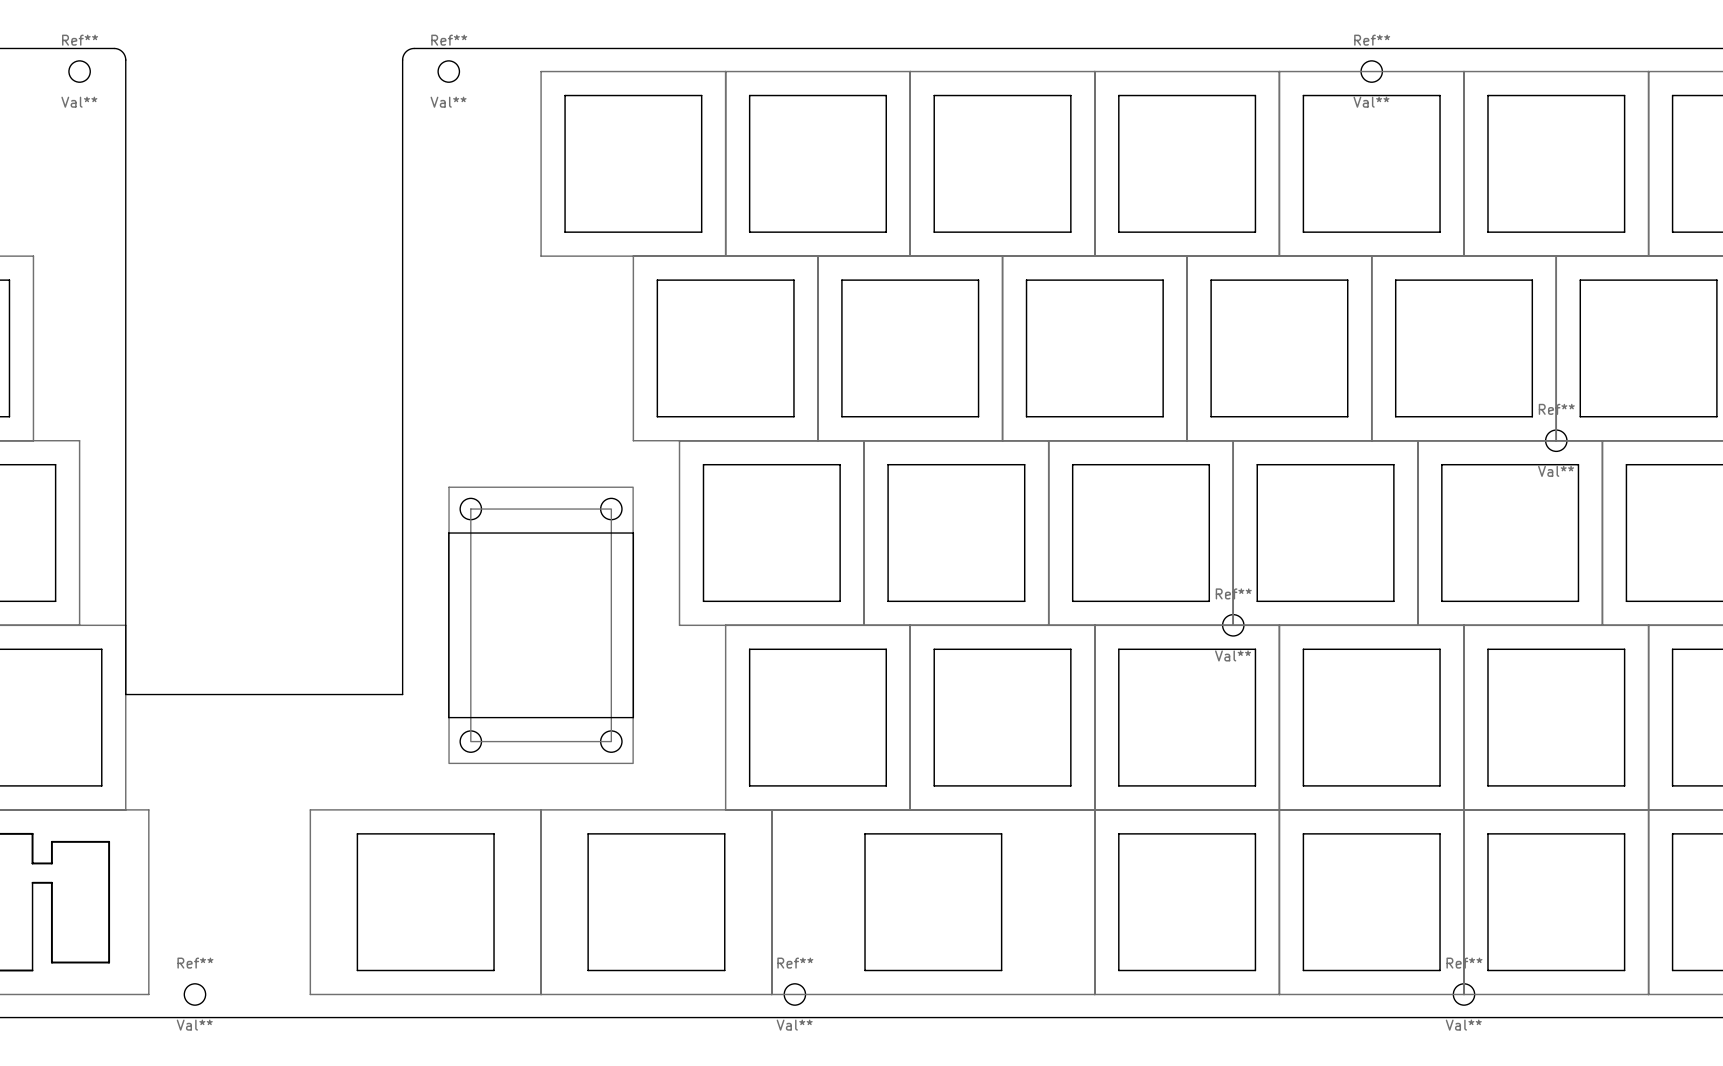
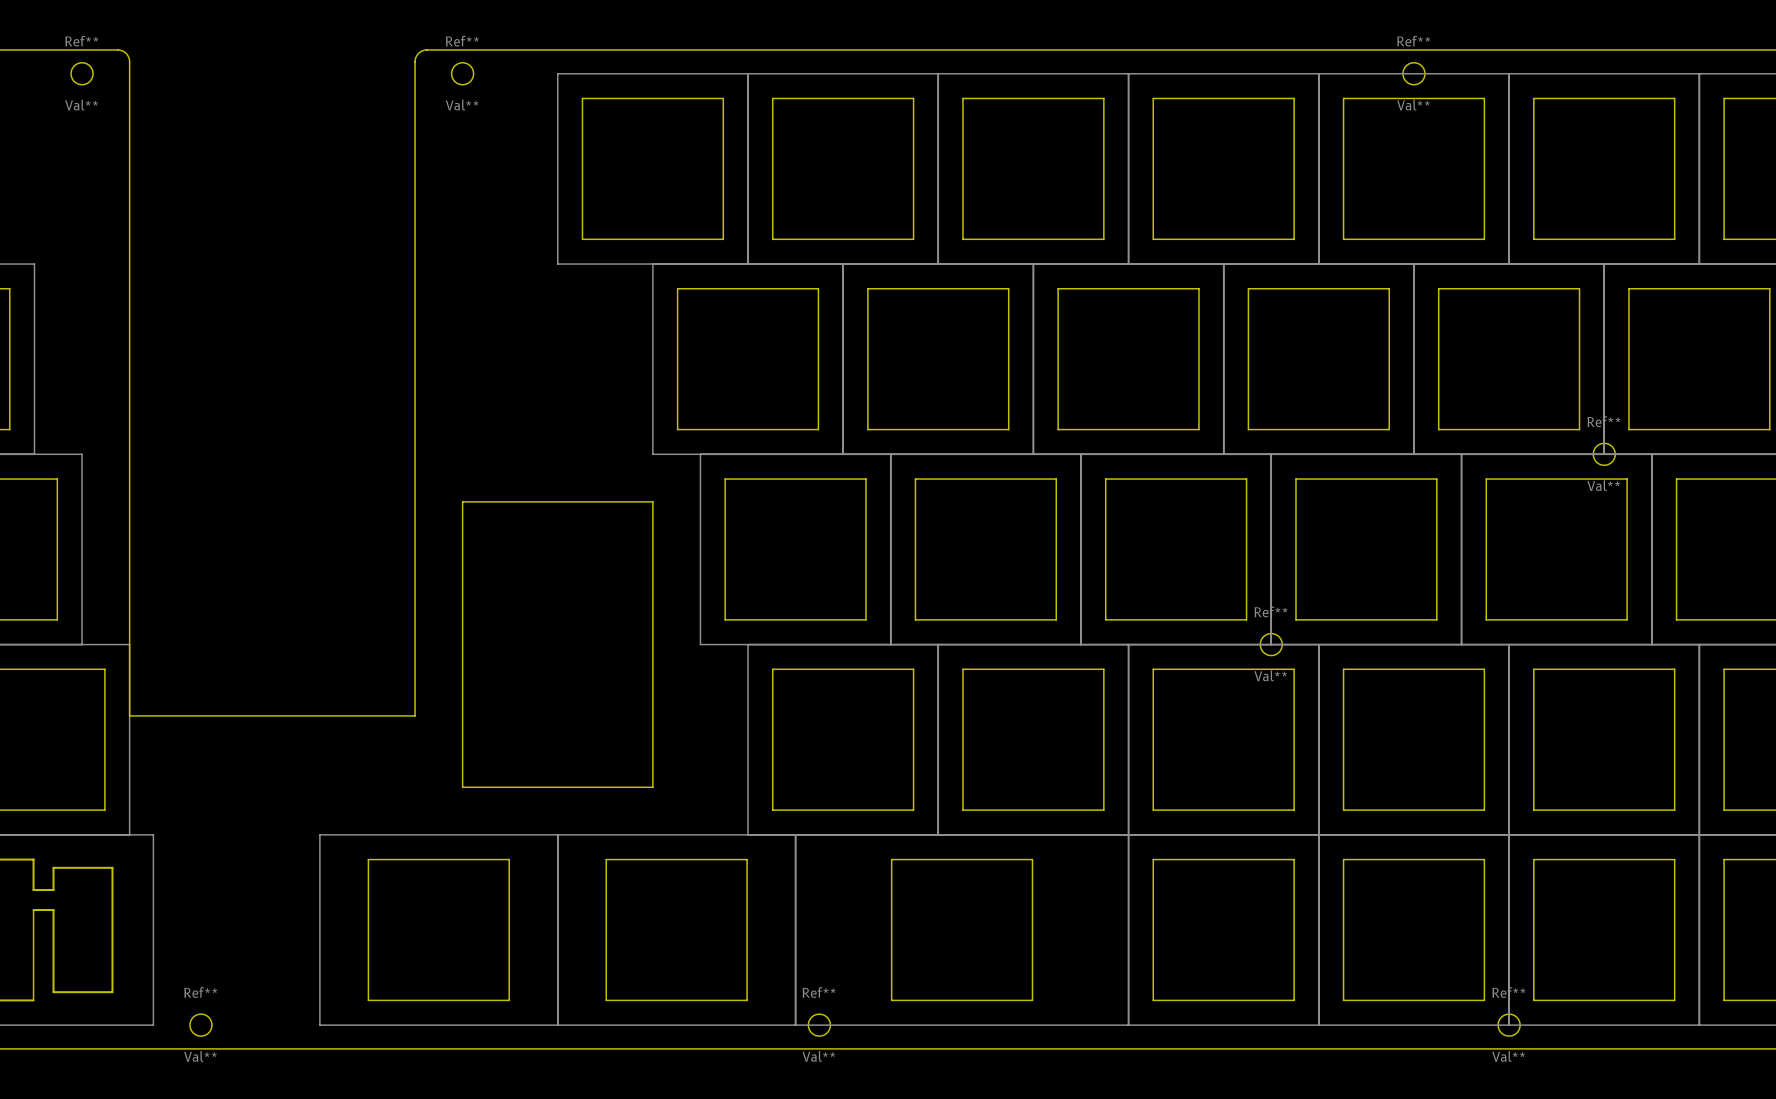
drawing: none -> [462, 501, 654, 788]
board edge: (448, 533) (633, 533) (633, 717) (448, 717) (448, 533) -> none
part: (541, 625) -> none

